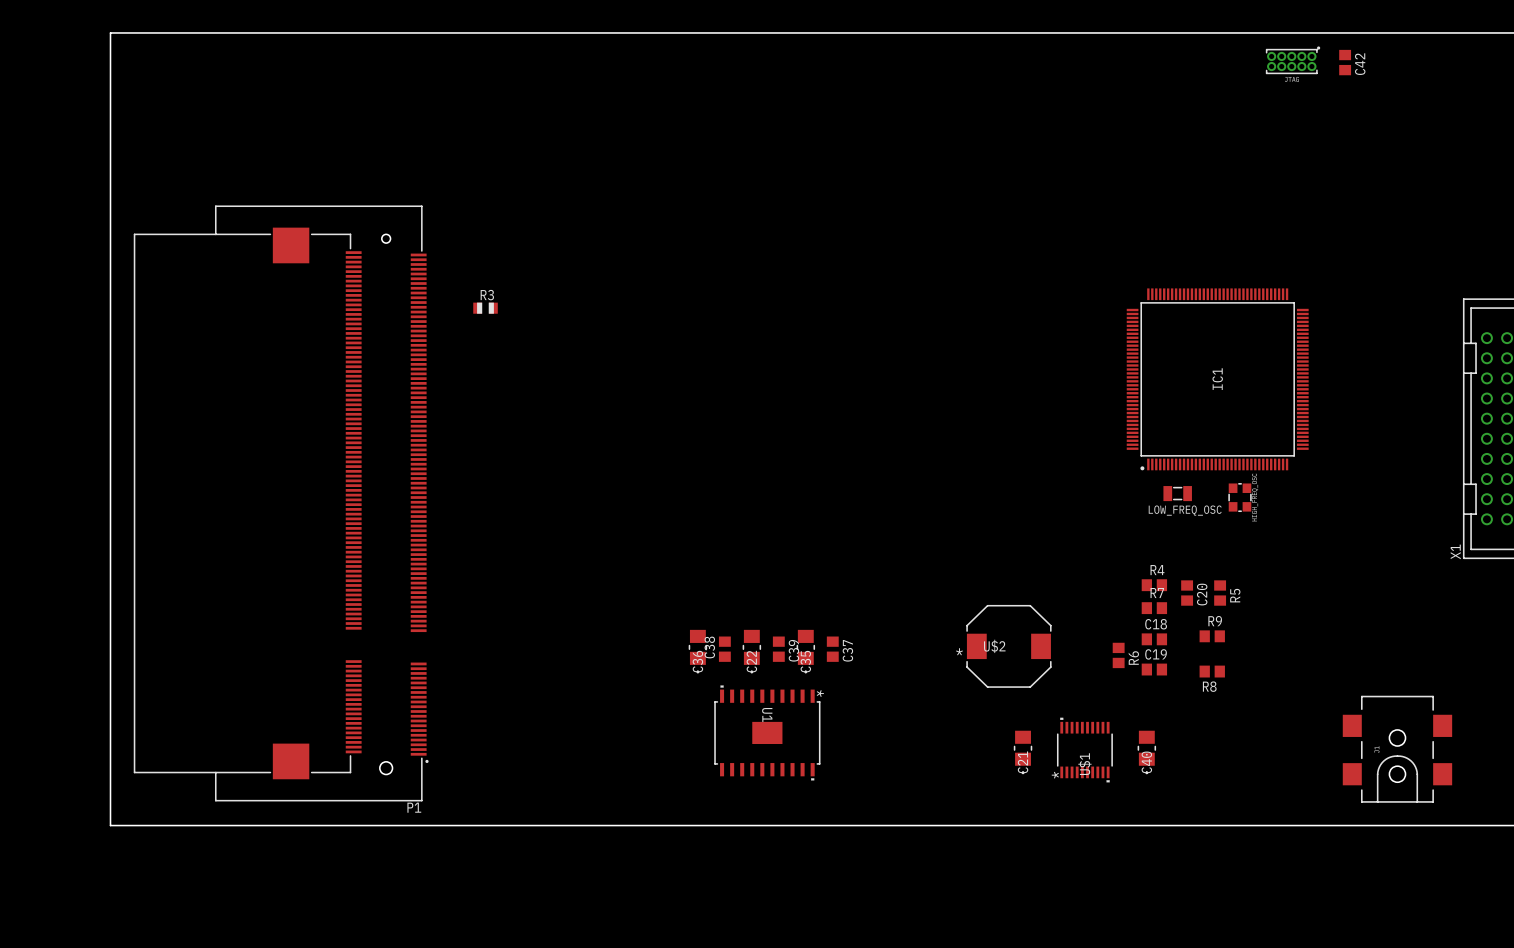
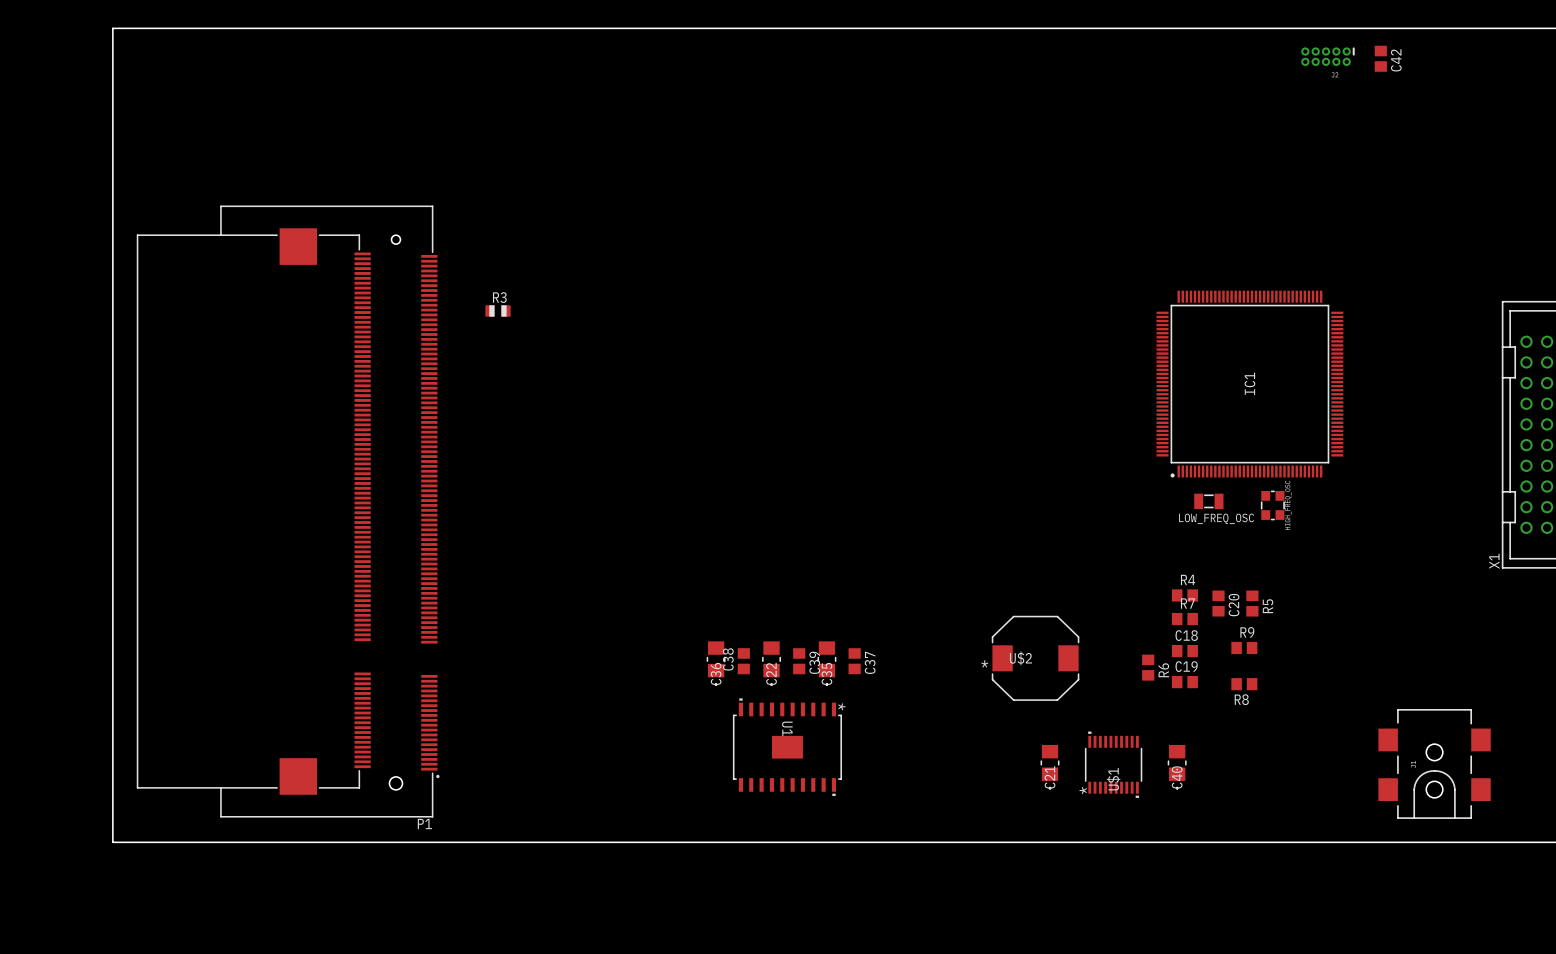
part: (1293, 60) -> none
part: none -> (1327, 56)

